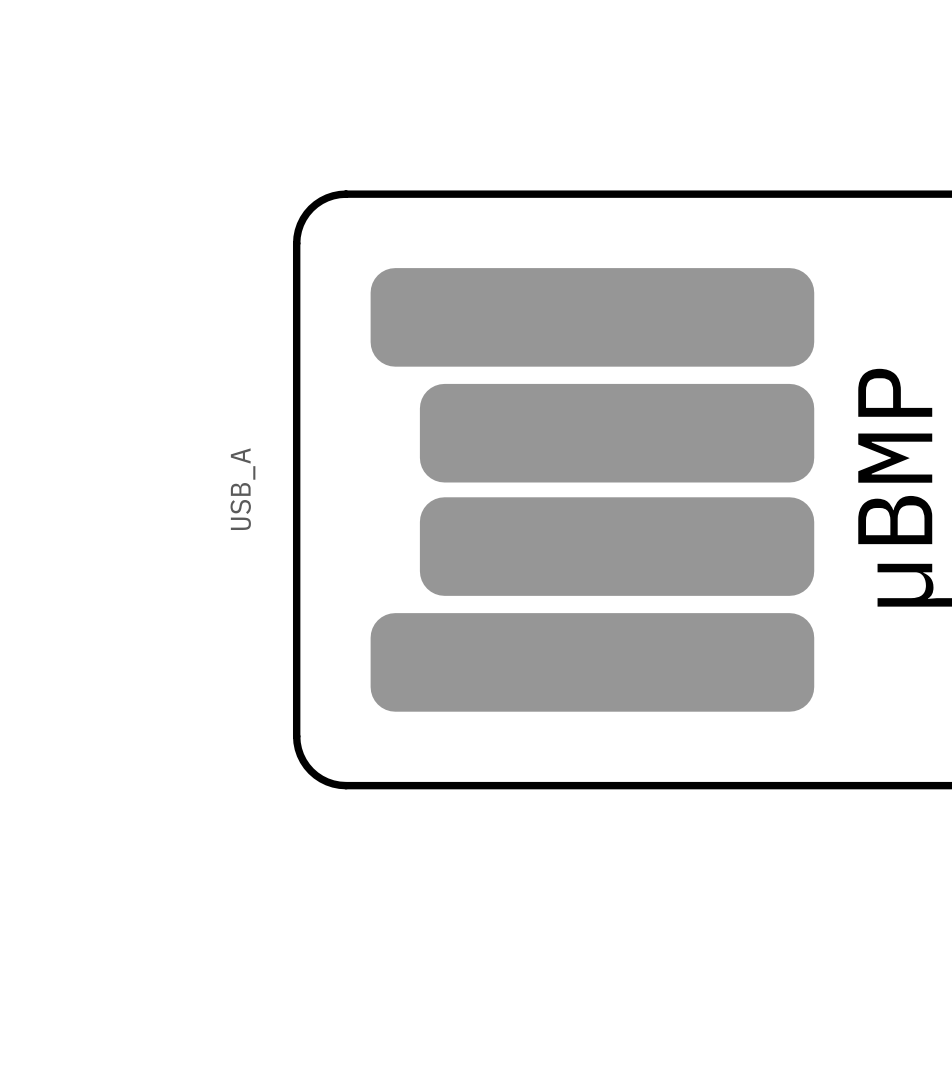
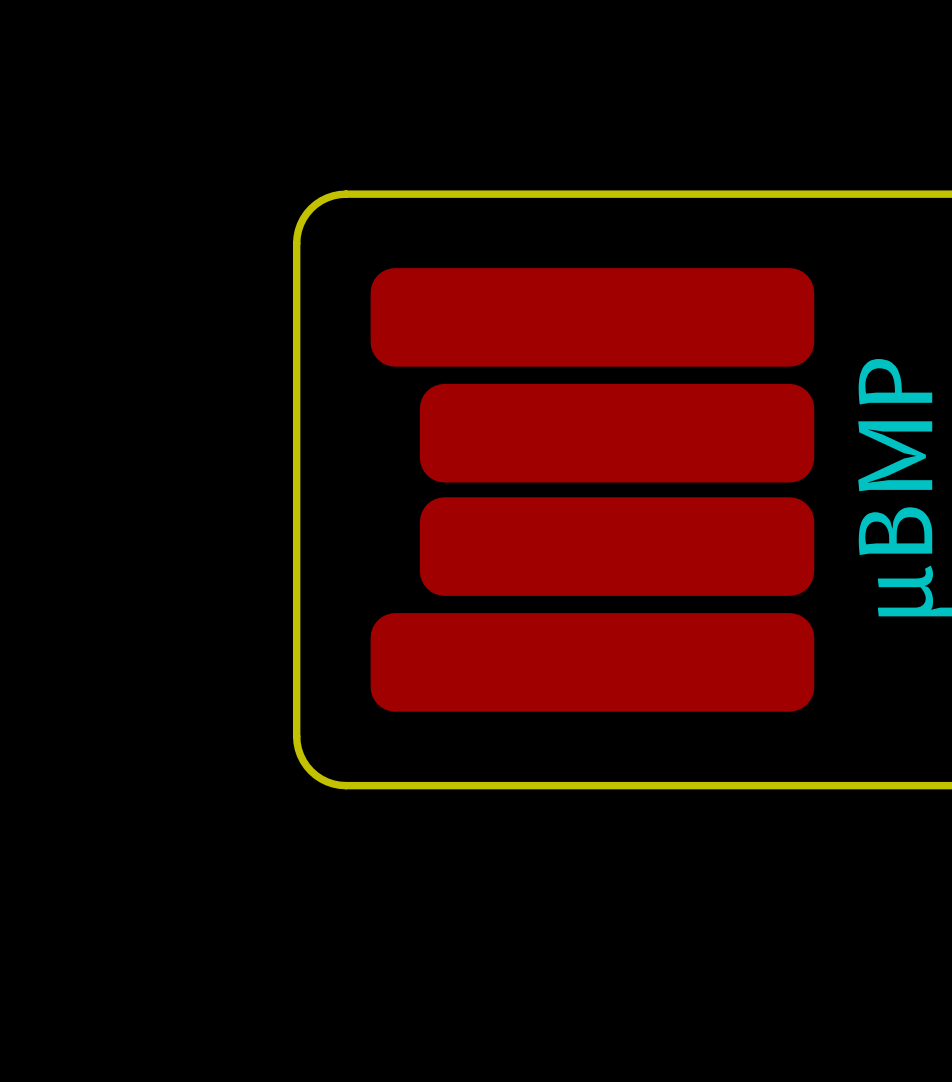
part value: USB_A (242, 489) -> none

